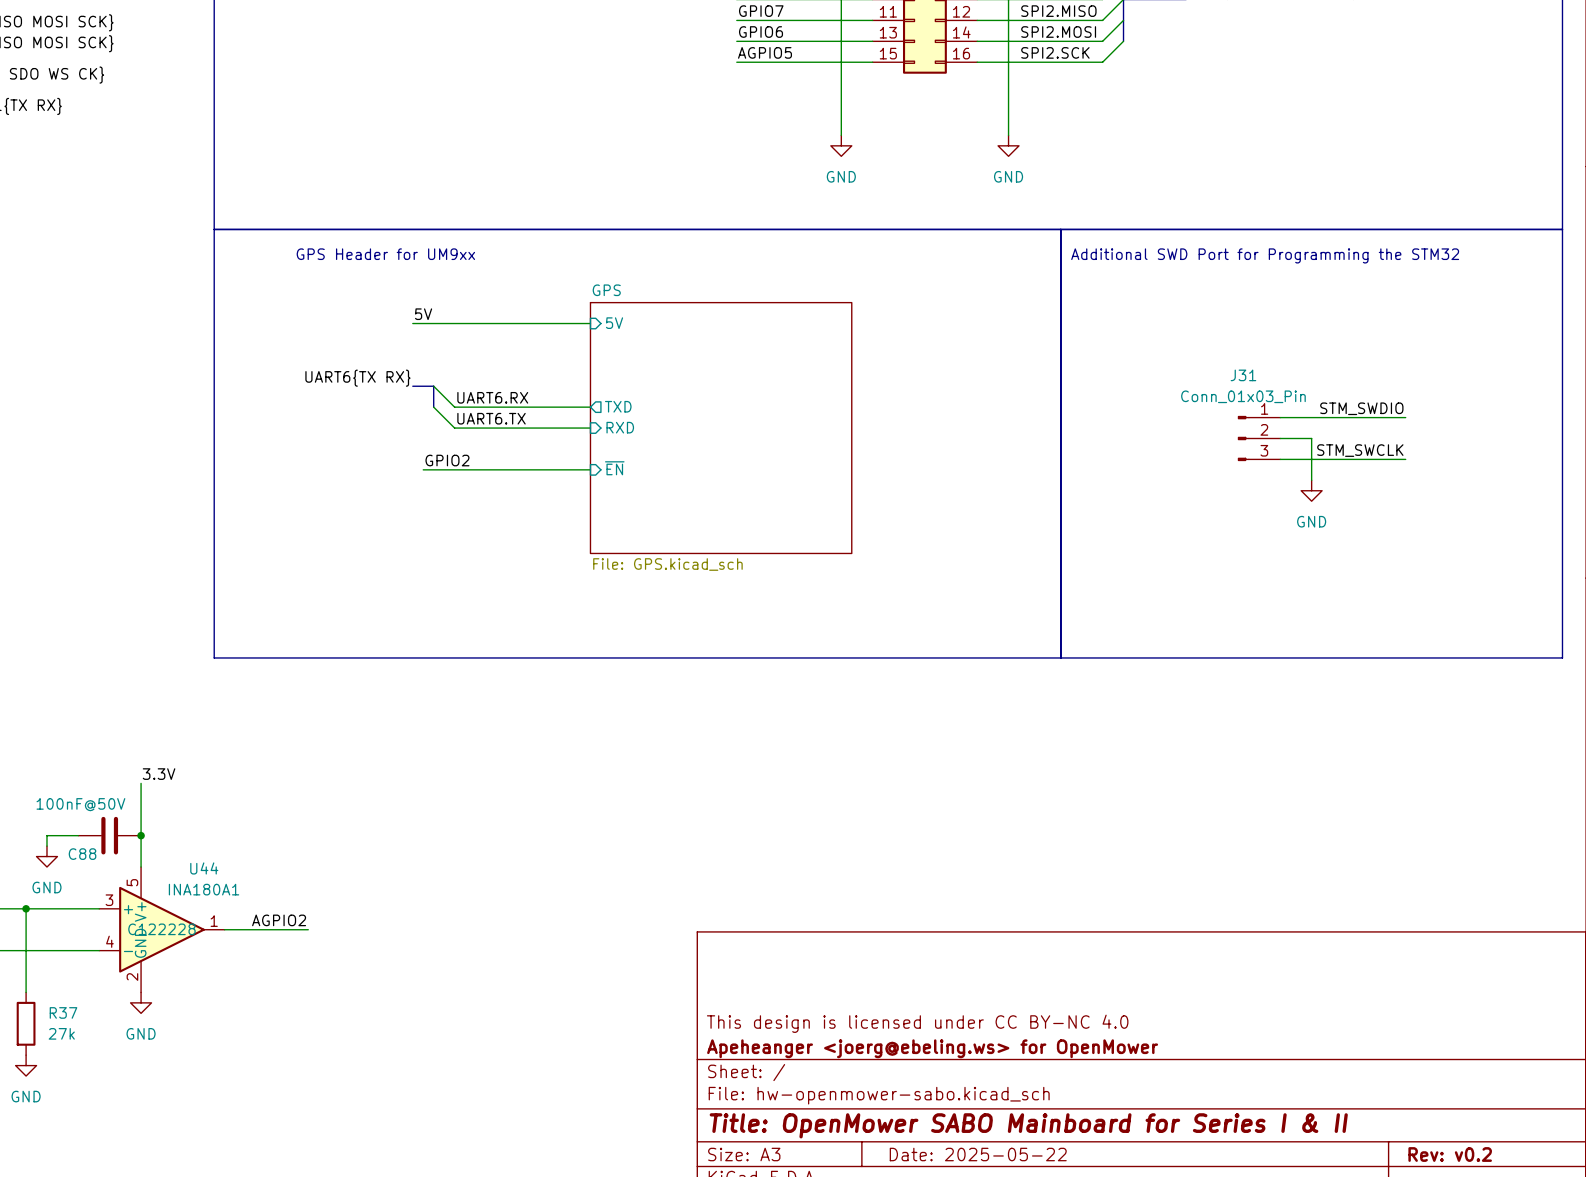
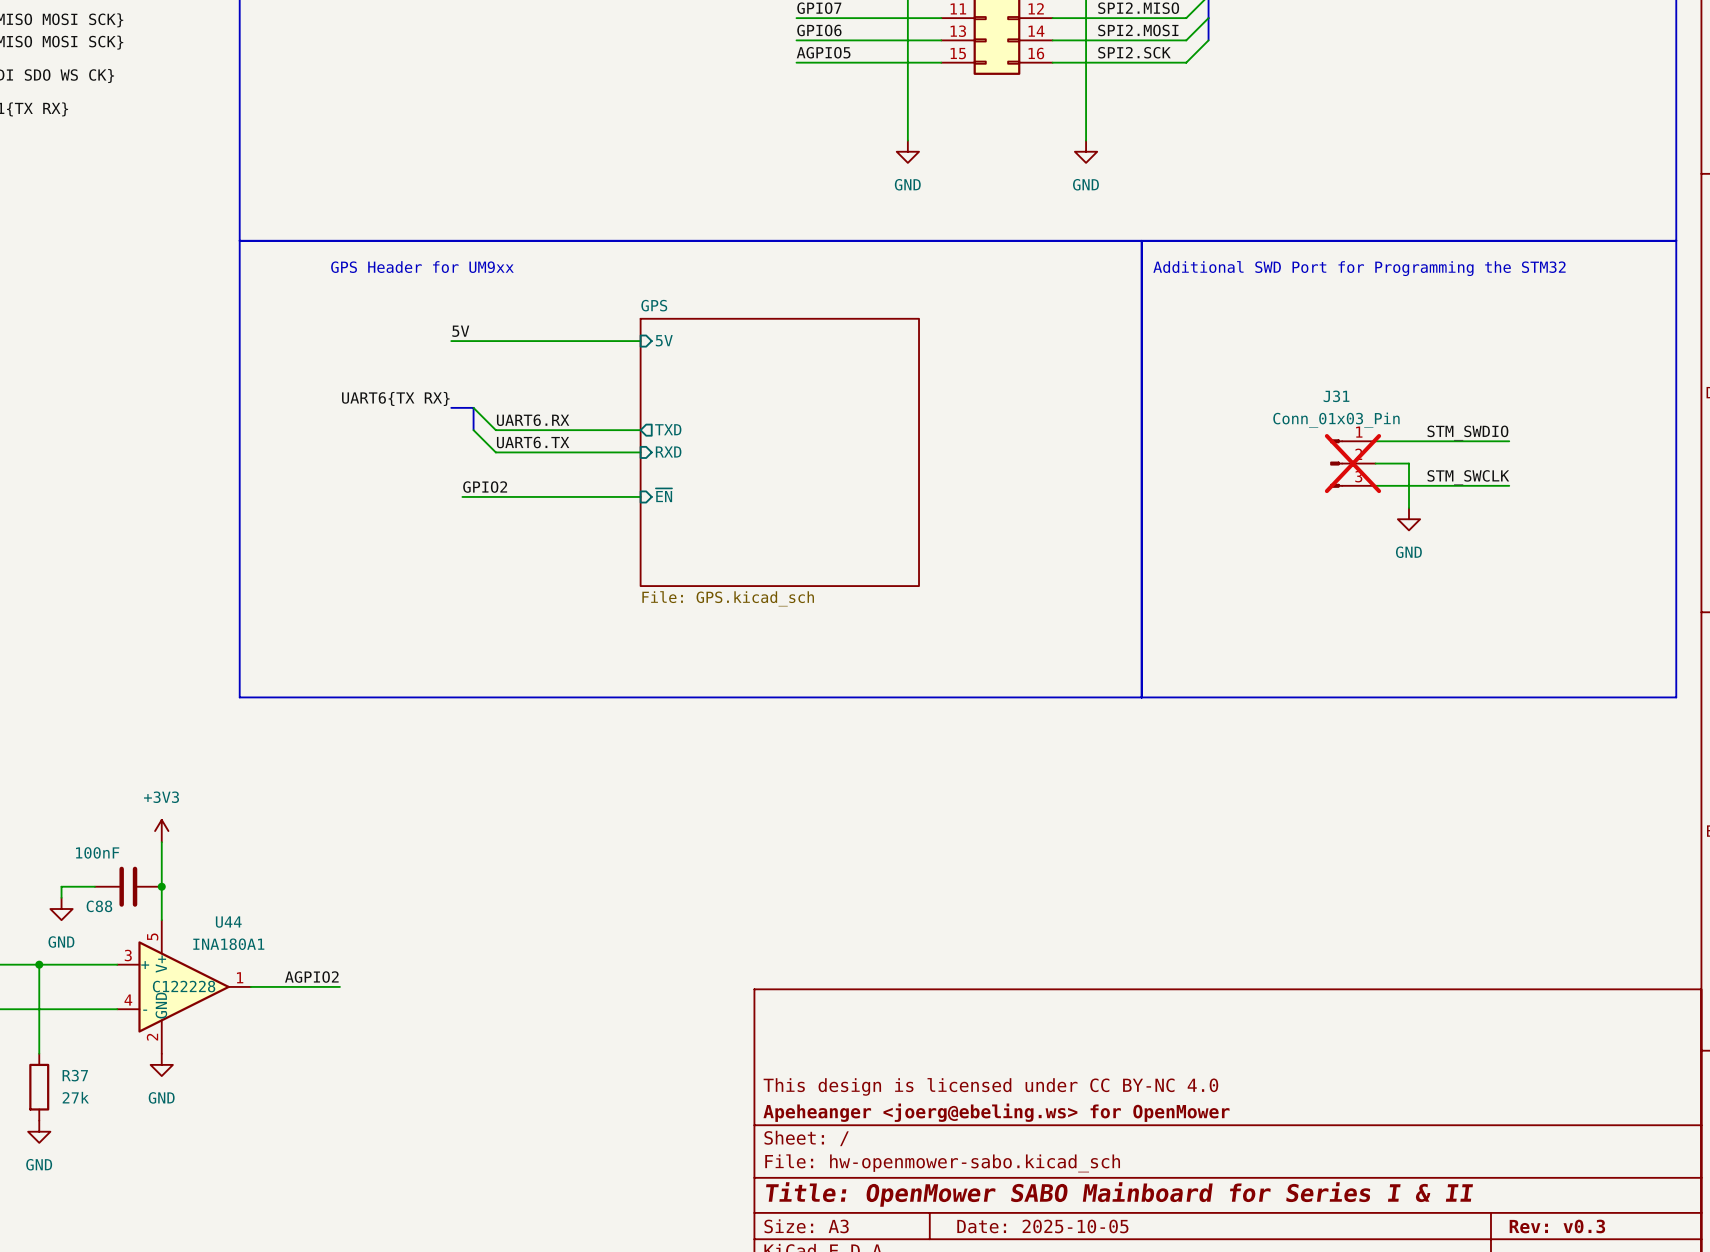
J31 do-not-place cross: none -> (1352, 463)
label: 3.3V (159, 774) -> none
power symbol: none -> +3V3 (161, 831)
C88 value: 100nF@50V (80, 804) -> 100nF (97, 852)
title block: Date: 2025-05-22 (978, 1154) -> Date: 2025-10-05 (1042, 1226)
title block: Rev: v0.2 (1450, 1154) -> Rev: v0.3 (1557, 1226)

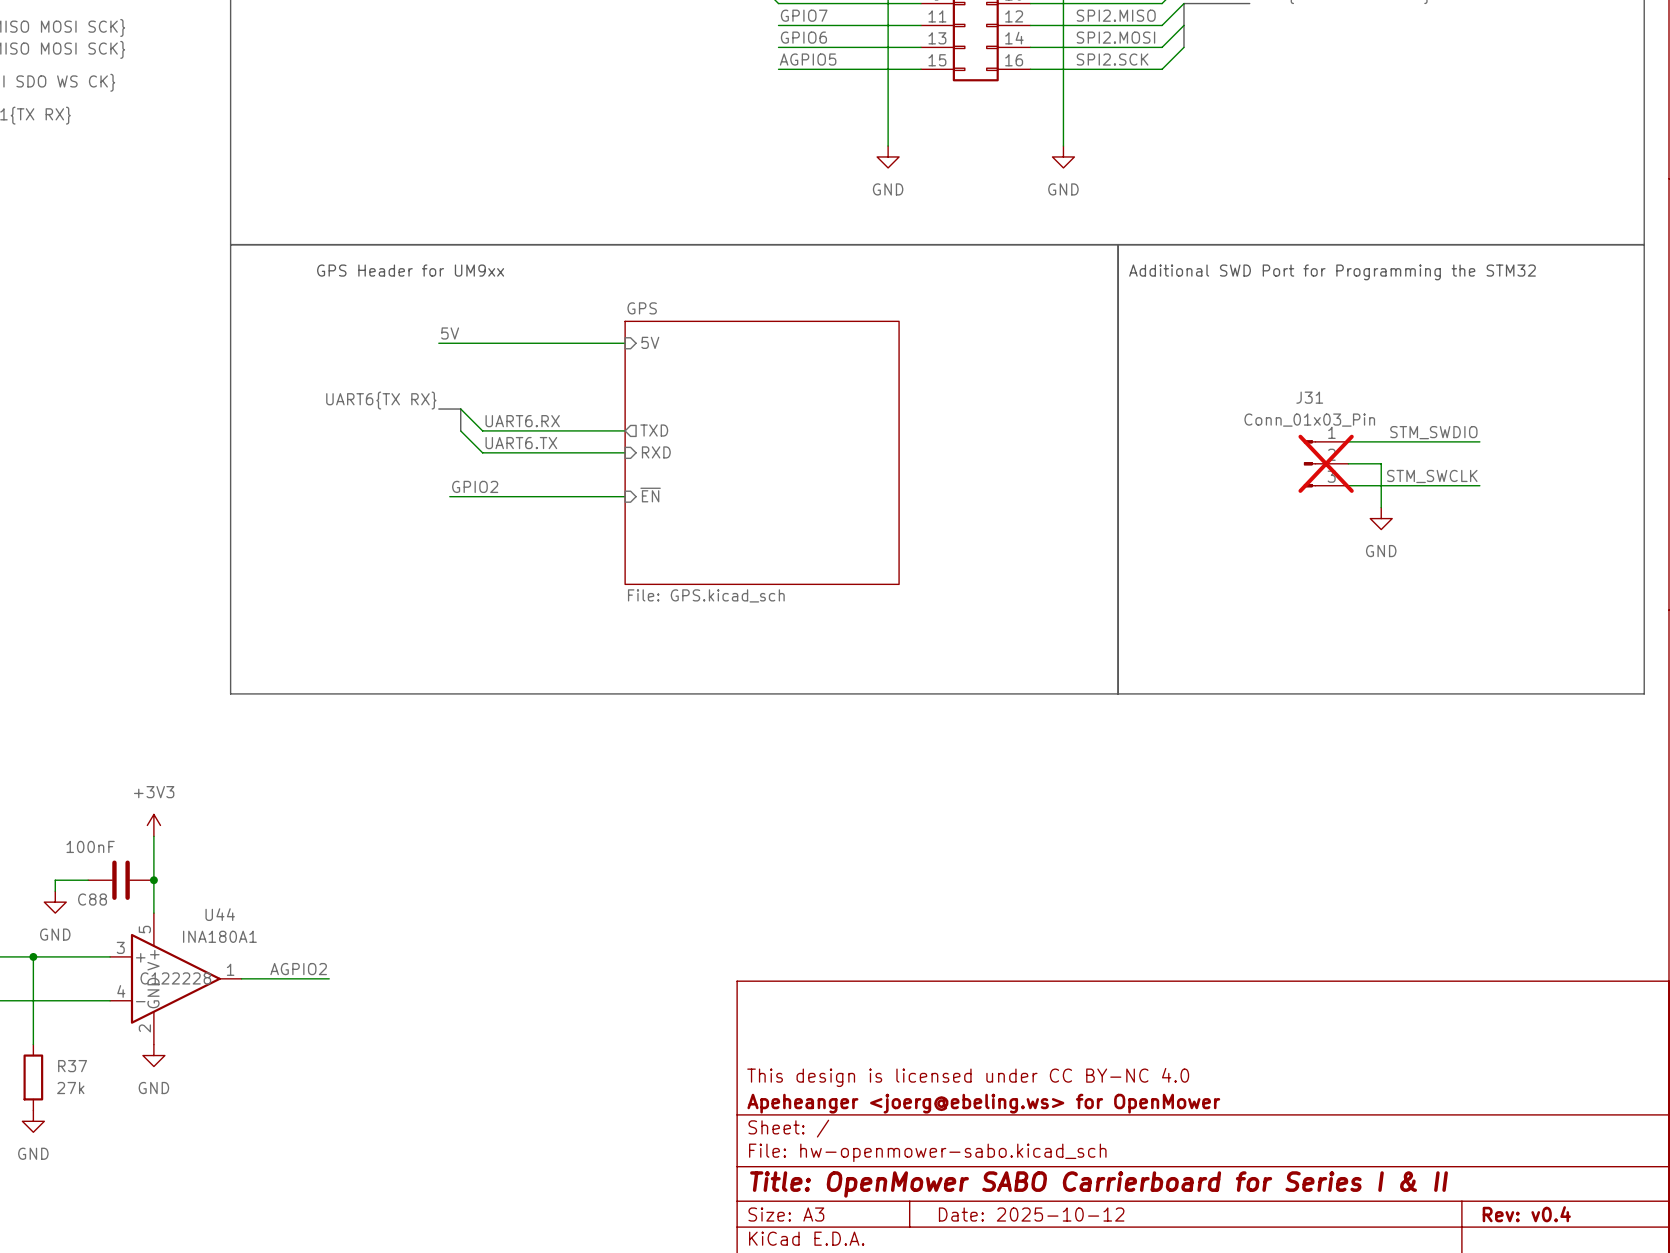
title block: Title: OpenMower SABO Mainboard for Series I & II (1119, 1194) -> Title: OpenMower SABO Carrierboard for Series I & II (1099, 1184)
title block: Date: 2025-10-05 (1042, 1226) -> Date: 2025-10-12 (1031, 1214)
title block: Rev: v0.3 (1557, 1226) -> Rev: v0.4 (1526, 1214)

